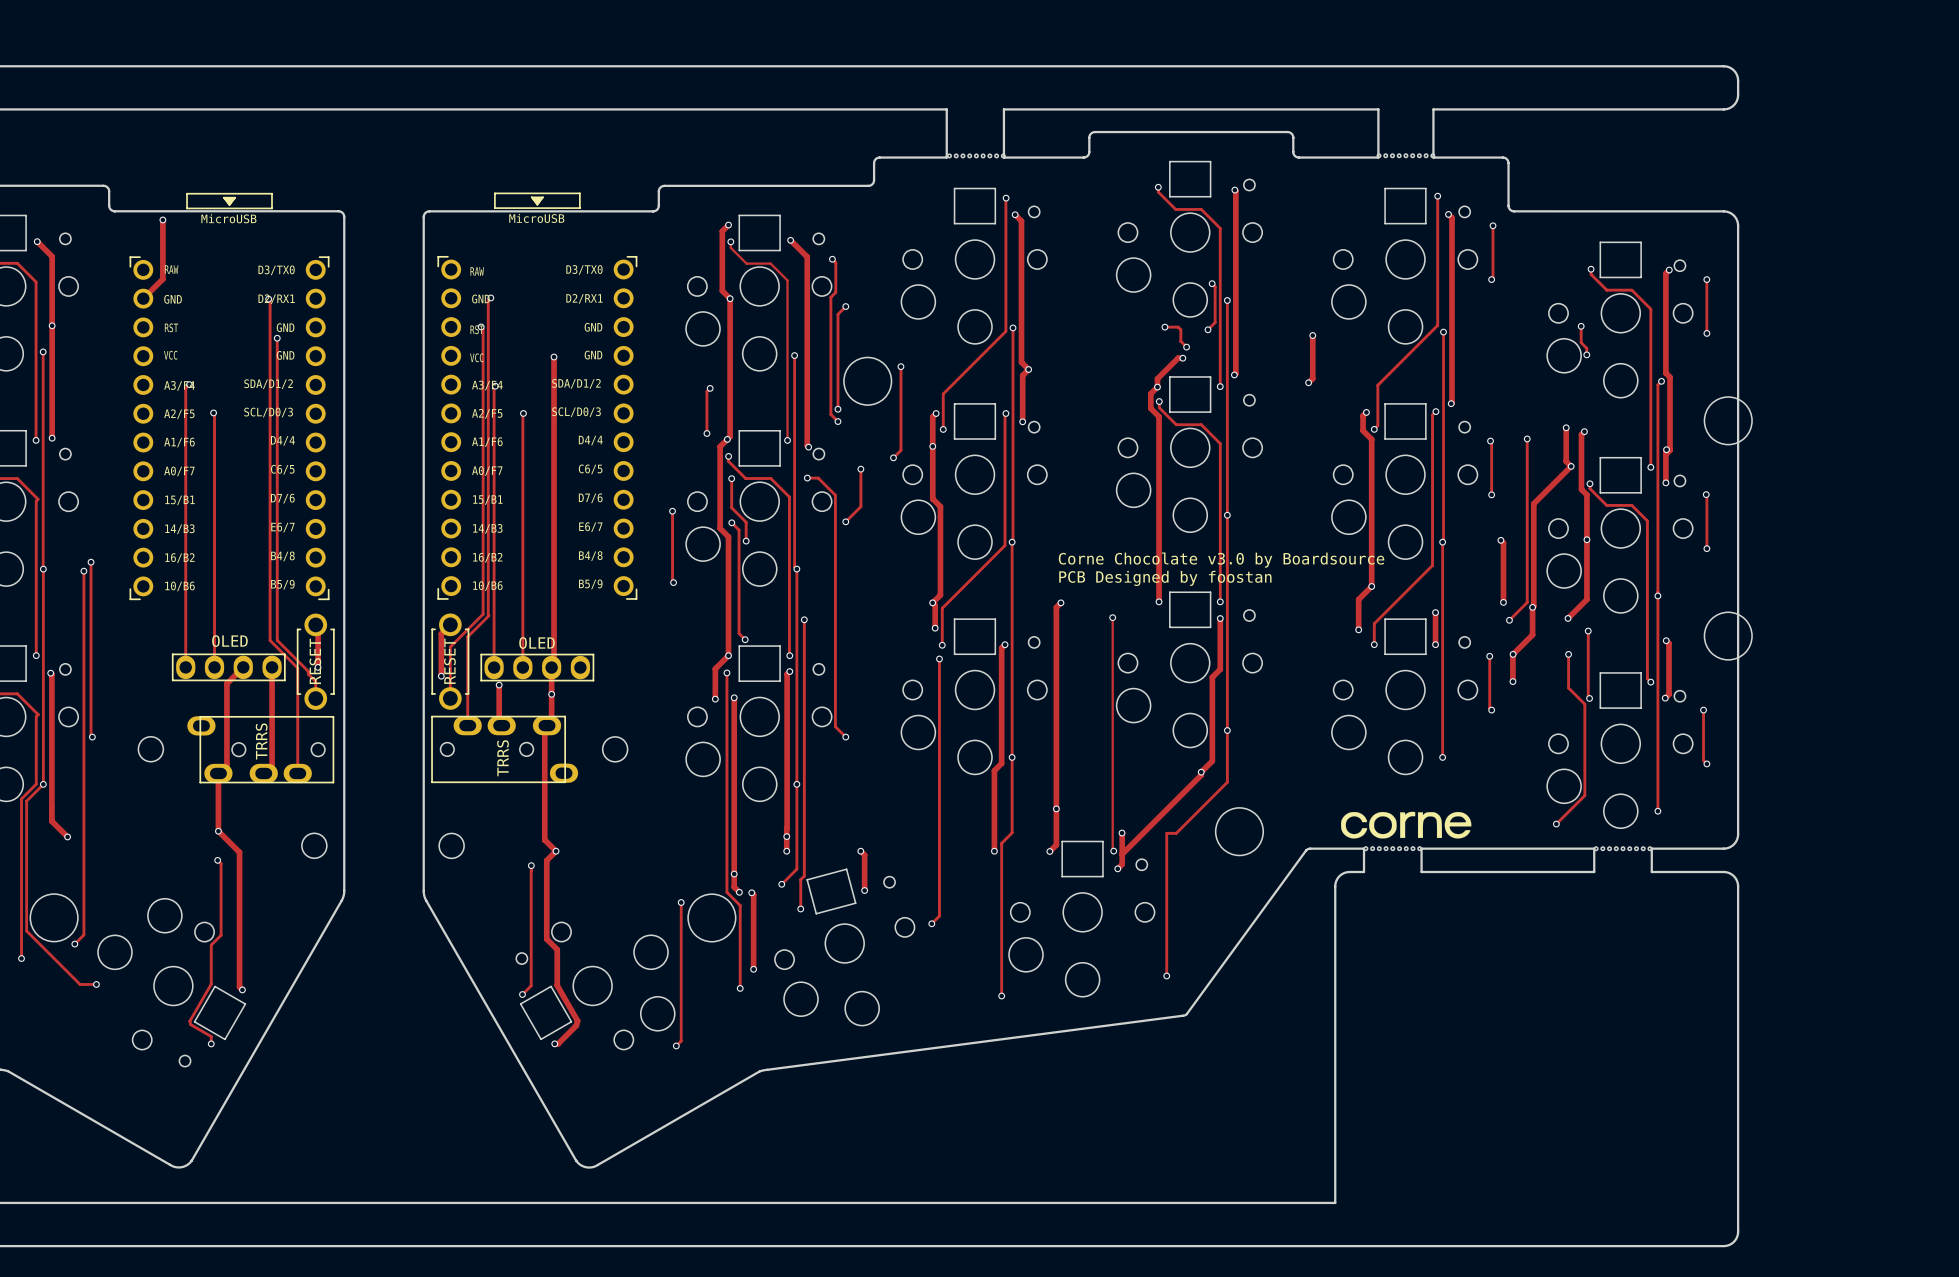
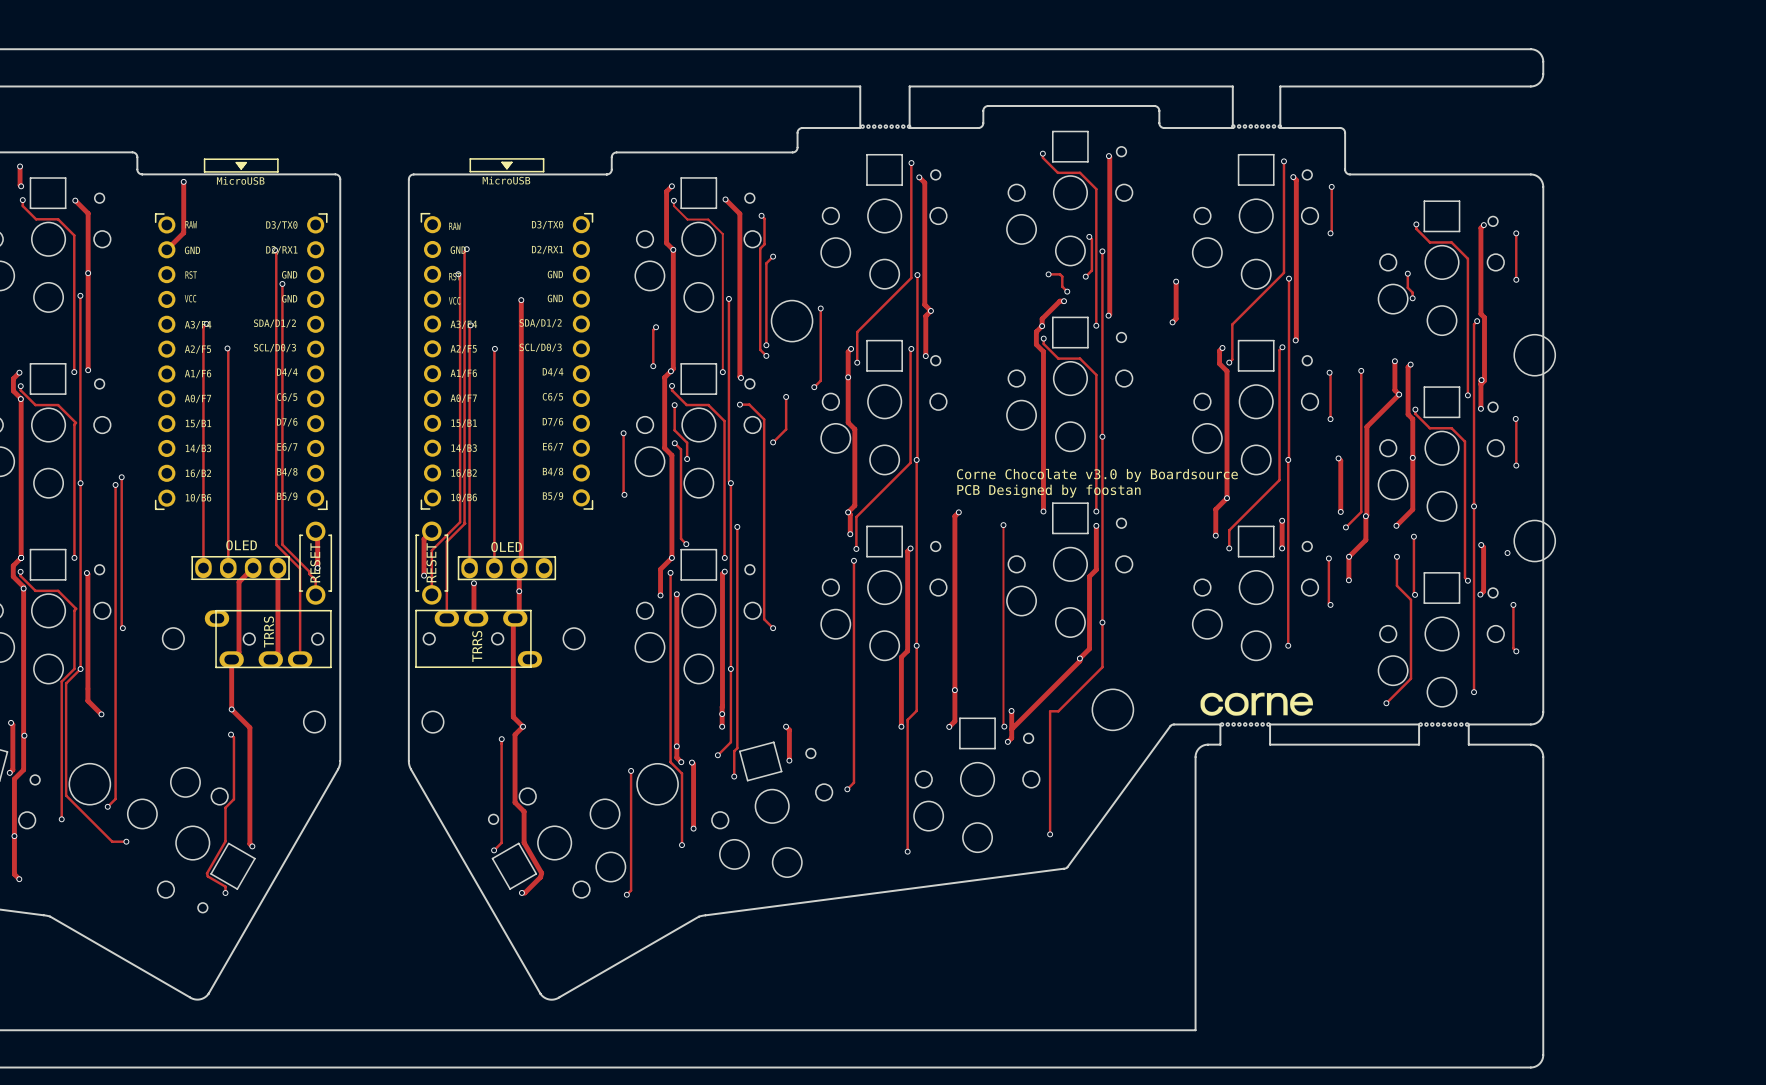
via: none -> (1507, 553)

